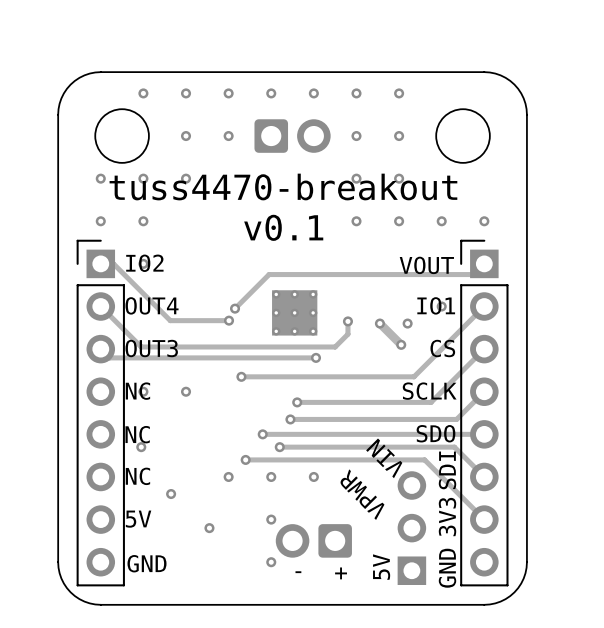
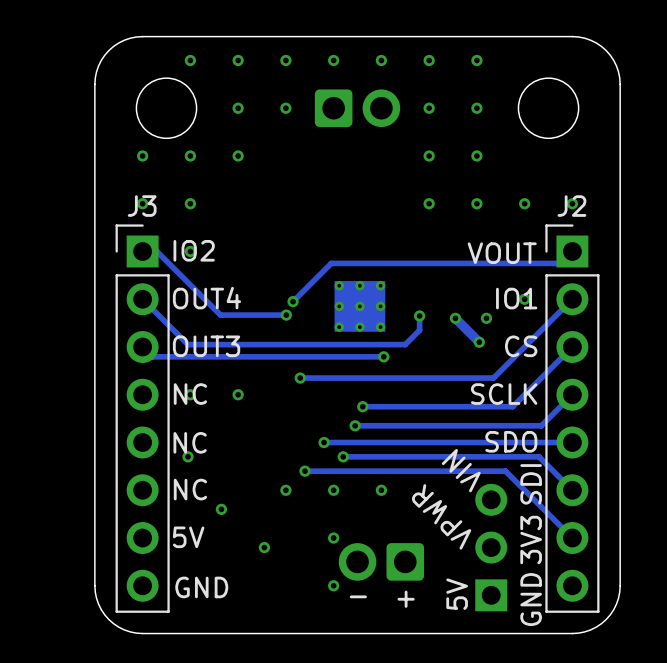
text: tuss4470-breakout (283, 187) -> none
J3 name: none -> J3 (142, 206)
J2 name: none -> J2 (571, 206)
text: v0.1 (283, 227) -> none

